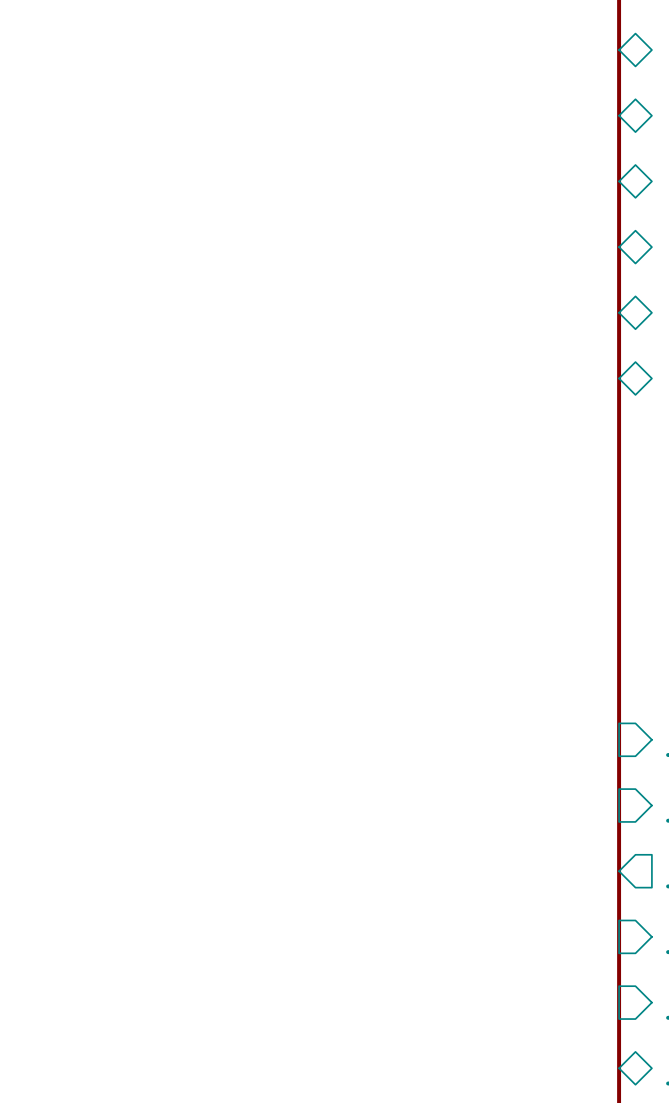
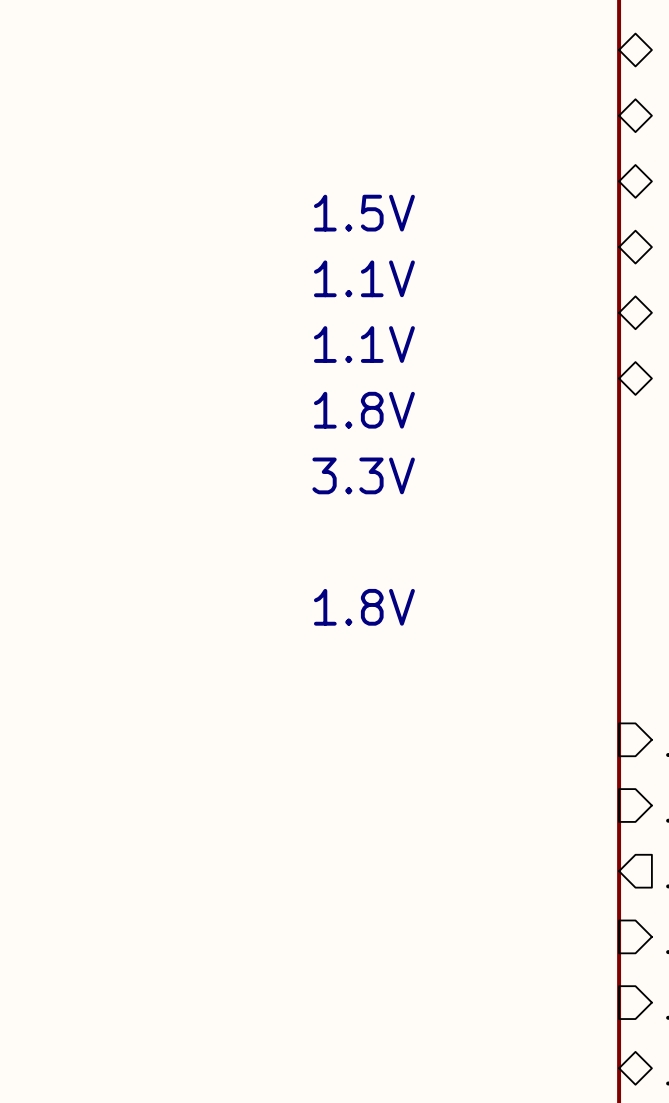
text: none -> 1.5V (364, 213)
text: none -> 1.1V (364, 278)
text: none -> 1.1V (364, 344)
text: none -> 1.8V (364, 410)
text: none -> 3.3V (363, 475)
text: none -> 1.8V (364, 607)

